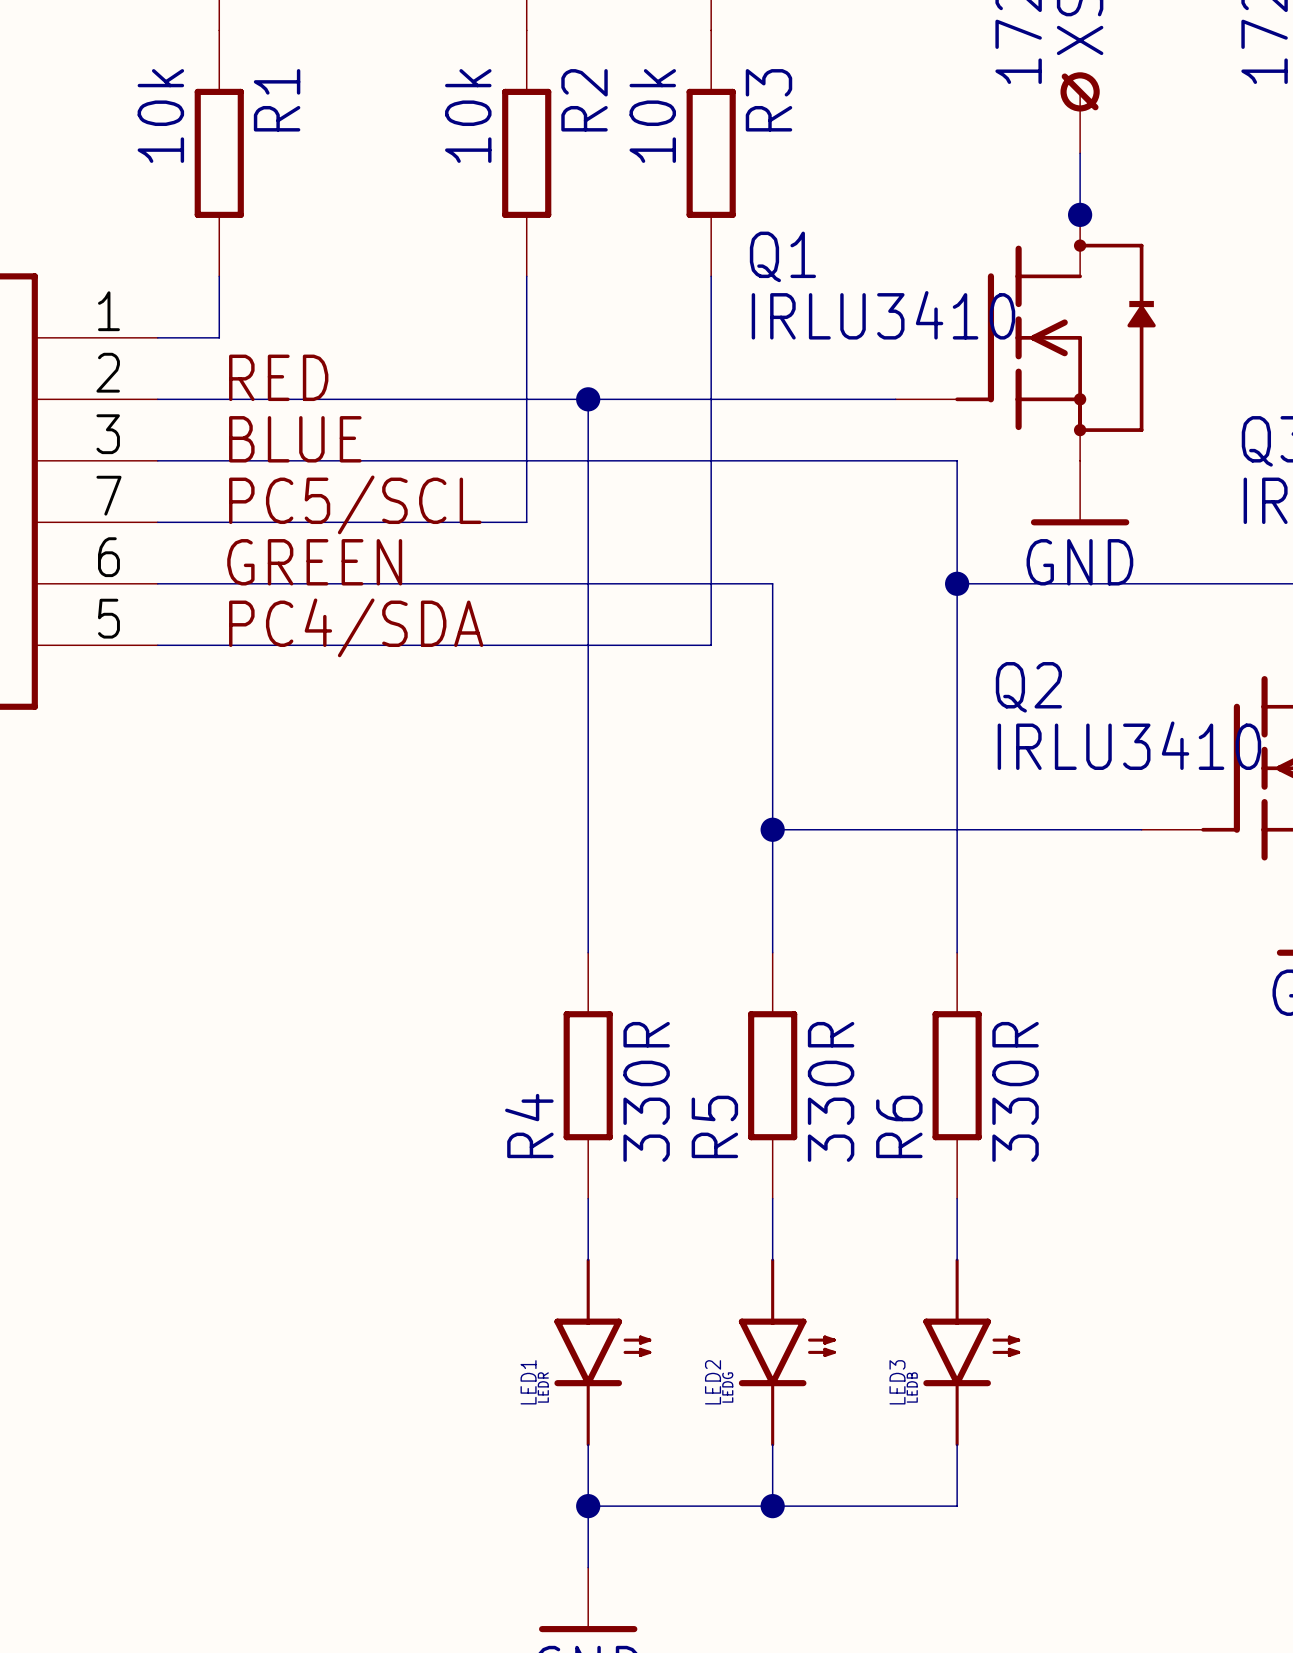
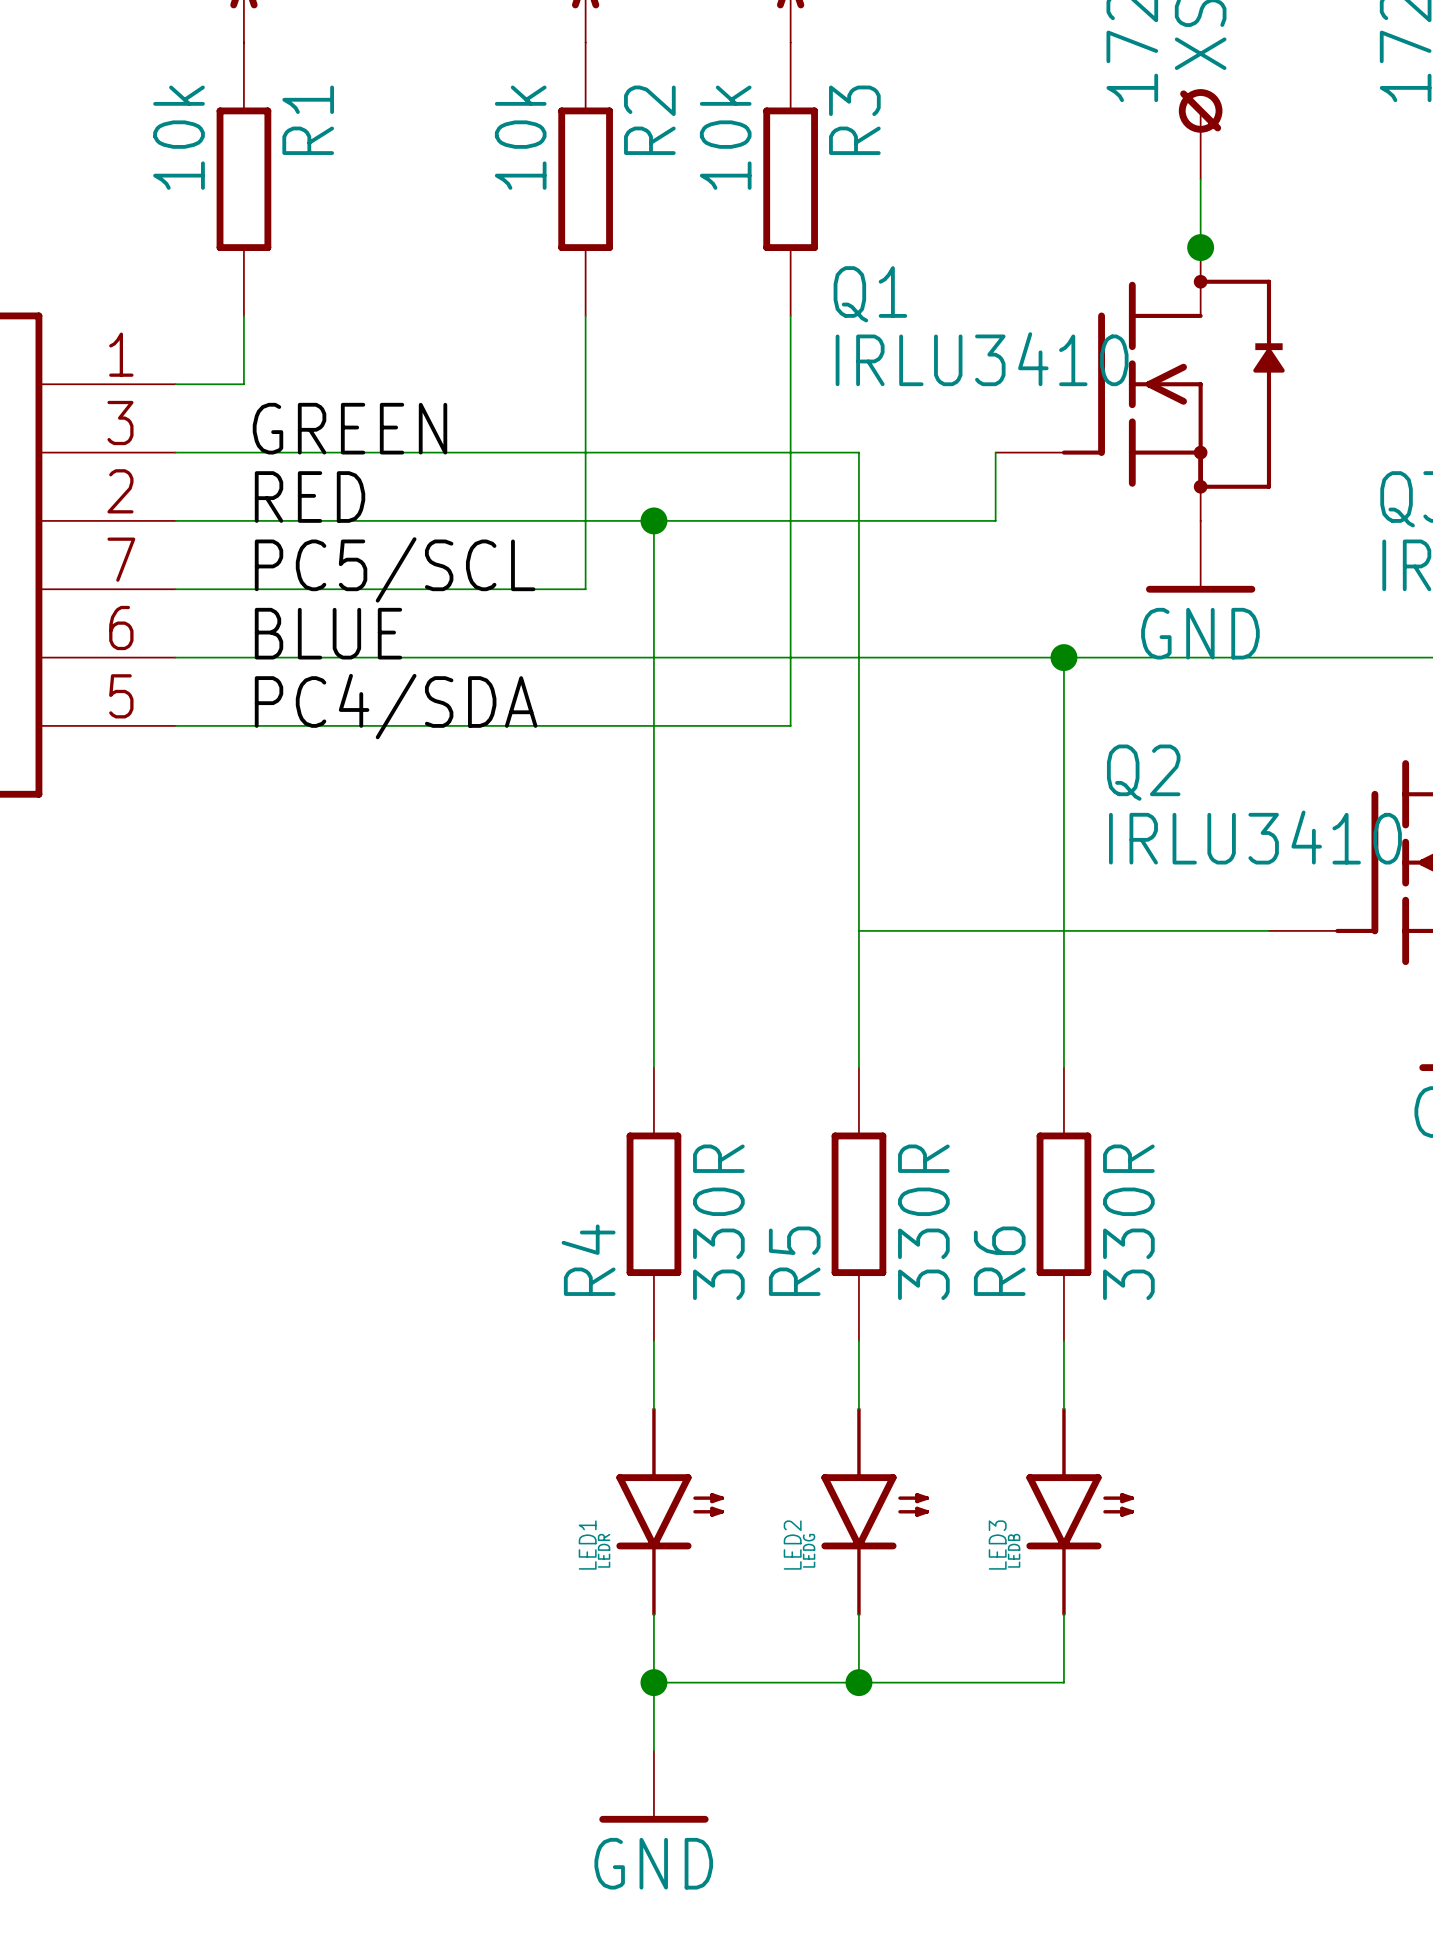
part pin number: 2 (108, 372) -> 3 (120, 422)
label: RED (278, 377) -> GREEN (349, 428)
wire: (588, 399) (588, 460) -> none
junction position: (588, 399) -> (653, 520)
wire: (772, 399) (895, 399) -> (995, 520) (995, 452)
part pin number: 3 (108, 434) -> 2 (120, 491)
label: BLUE (295, 439) -> RED (310, 497)
wire: (895, 460) (957, 460) (957, 583) -> (858, 452) (858, 657) (1063, 657)
label: GREEN (314, 562) -> BLUE (328, 633)
junction: (772, 829) -> none

